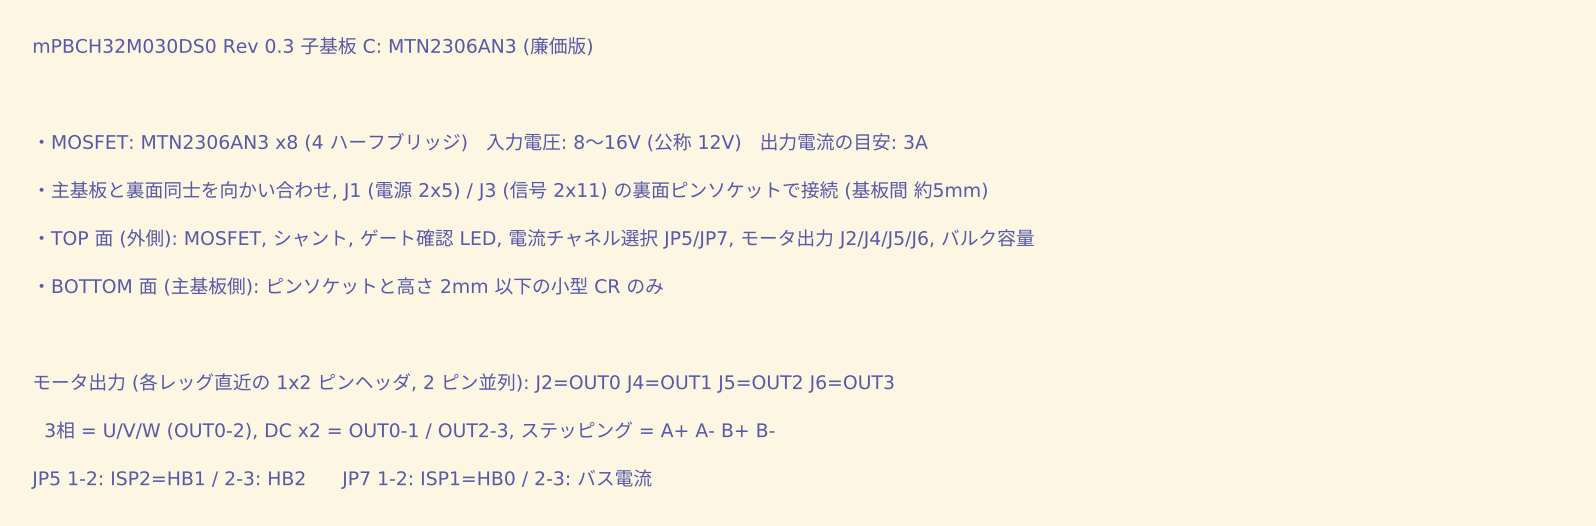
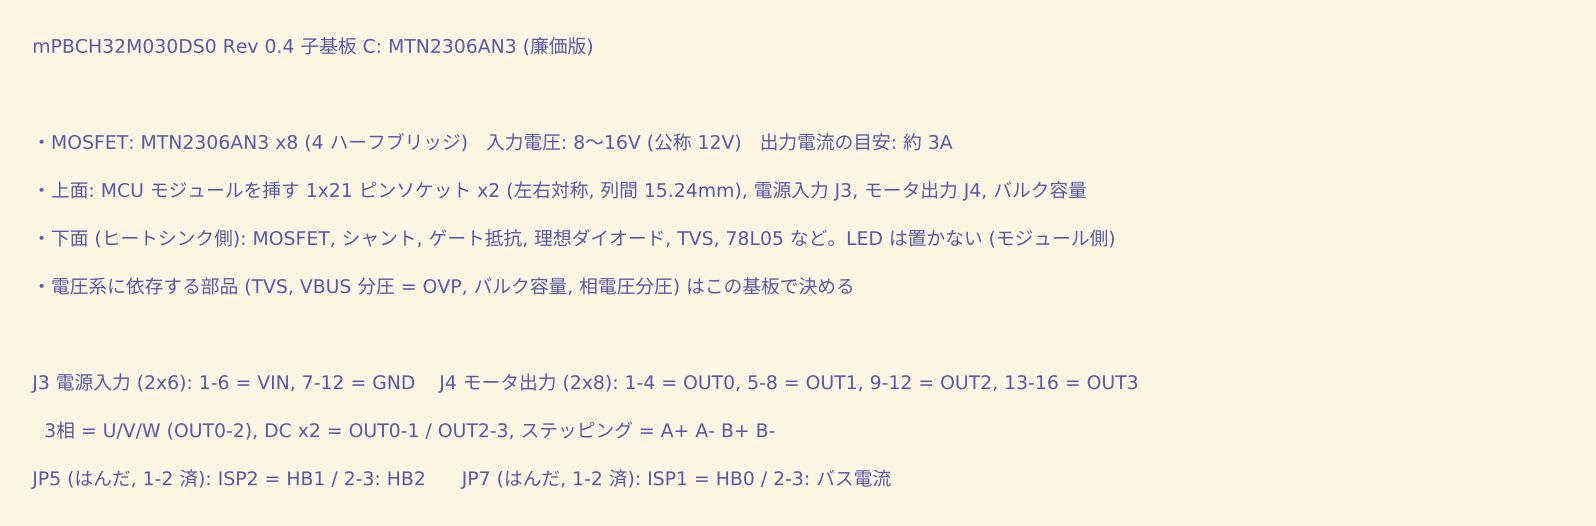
text: mPBCH32M030DS0 Rev 0.3 子基板 C: MTN2306AN3 (廉価版) (312, 46) -> mPBCH32M030DS0 Rev 0.4 子基板 C: MTN2306AN3 (廉価版) (312, 46)
text: ・MOSFET: MTN2306AN3 x8 (4 ハーフブリッジ) 入力電圧: 8〜16V (公称 12V) 出力電流の目安: 3A (483, 142) -> ・MOSFET: MTN2306AN3 x8 (4 ハーフブリッジ) 入力電圧: 8〜16V (公称 12V) 出力電流の目安: 約 3A (496, 142)
text: ・主基板と裏面同士を向かい合わせ, J1 (電源 2x5) / J3 (信号 2x11) の裏面ピンソケットで接続 (基板間 約5mm) (513, 190) -> ・上面: MCU モジュールを挿す 1x21 ピンソケット x2 (左右対称, 列間 15.24mm), 電源入力 J3, モータ出力 J4, バルク容量 (562, 190)
text: ・TOP 面 (外側): MOSFET, シャント, ゲート確認 LED, 電流チャネル選択 JP5/JP7, モータ出力 J2/J4/J5/J6, バルク容量 (536, 238) -> ・下面 (ヒートシンク側): MOSFET, シャント, ゲート抵抗, 理想ダイオード, TVS, 78L05 など。LED は置かない (モジュール側) (576, 238)
text: ・BOTTOM 面 (主基板側): ピンソケットと高さ 2mm 以下の小型 CR のみ (351, 286) -> ・電圧系に依存する部品 (TVS, VBUS 分圧 = OVP, バルク容量, 相電圧分圧) はこの基板で決める (445, 286)
text: モータ出力 (各レッグ直近の 1x2 ピンヘッダ, 2 ピン並列): J2=OUT0 J4=OUT1 J5=OUT2 J6=OUT3 (463, 383) -> J3 電源入力 (2x6): 1-6 = VIN, 7-12 = GND J4 モータ出力 (2x8): 1-4 = OUT0, 5-8 = OUT1, 9-12 = OUT2, 13-16 = OUT3 (584, 383)
text: JP5 1-2: ISP2=HB1 / 2-3: HB2 JP7 1-2: ISP1=HB0 / 2-3: バス電流 (341, 479) -> JP5 (はんだ, 1-2 済): ISP2 = HB1 / 2-3: HB2 JP7 (はんだ, 1-2 済): ISP1 = HB0 / 2-3: バス電流 (460, 479)

